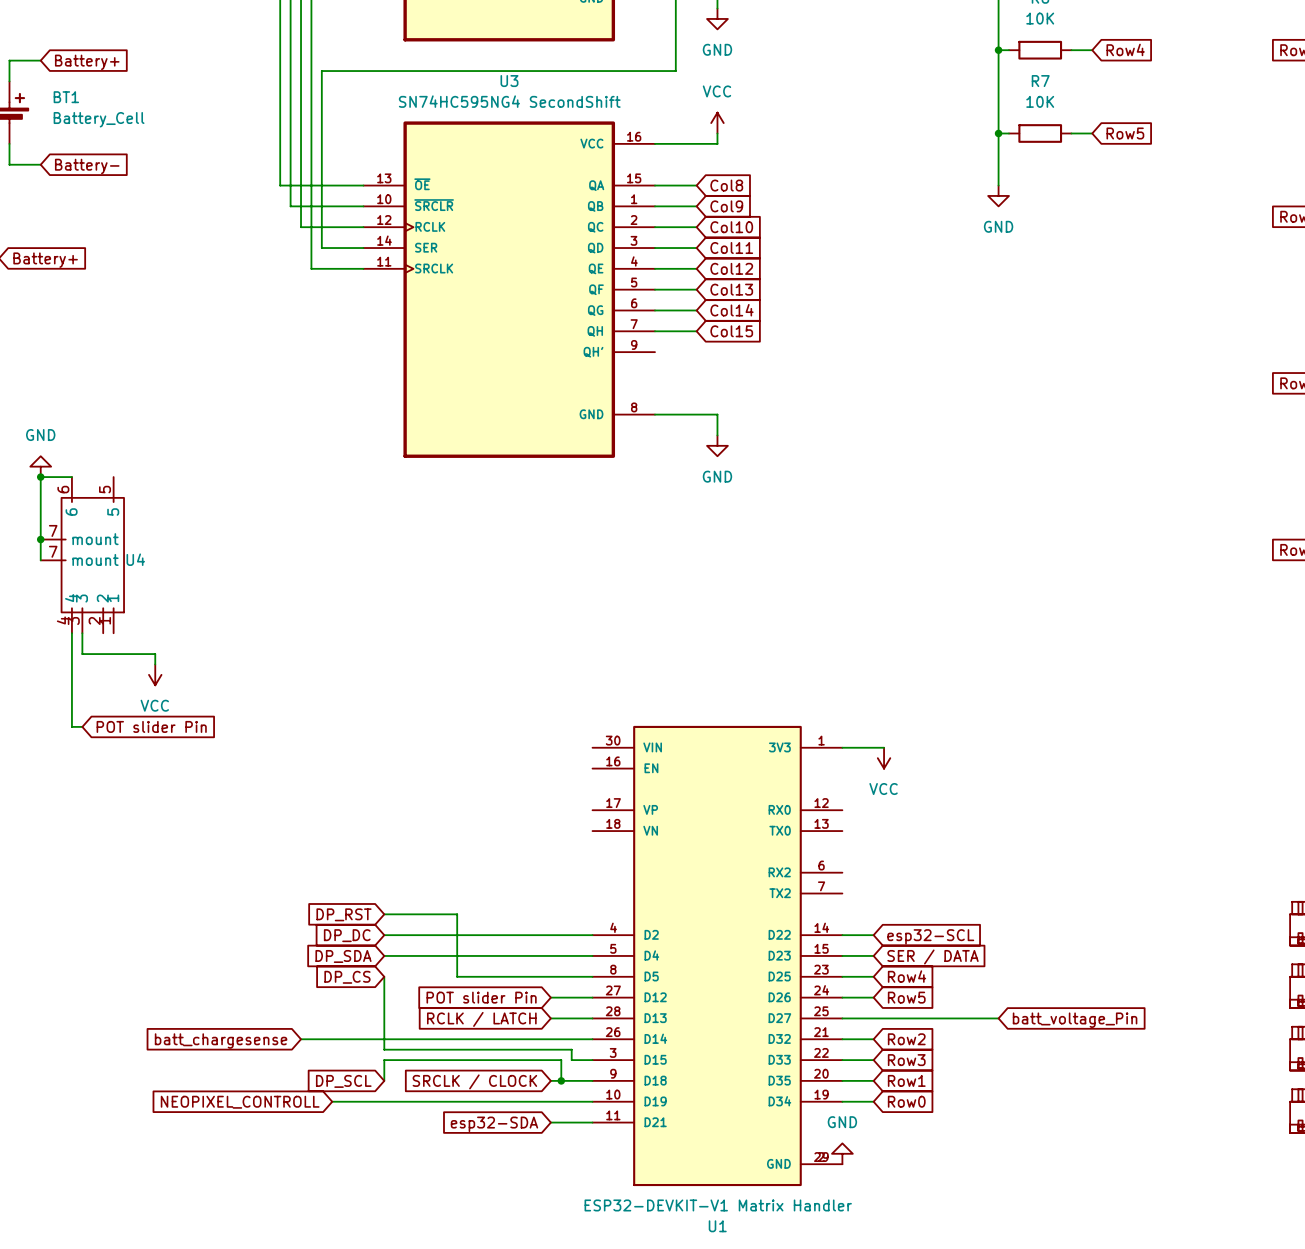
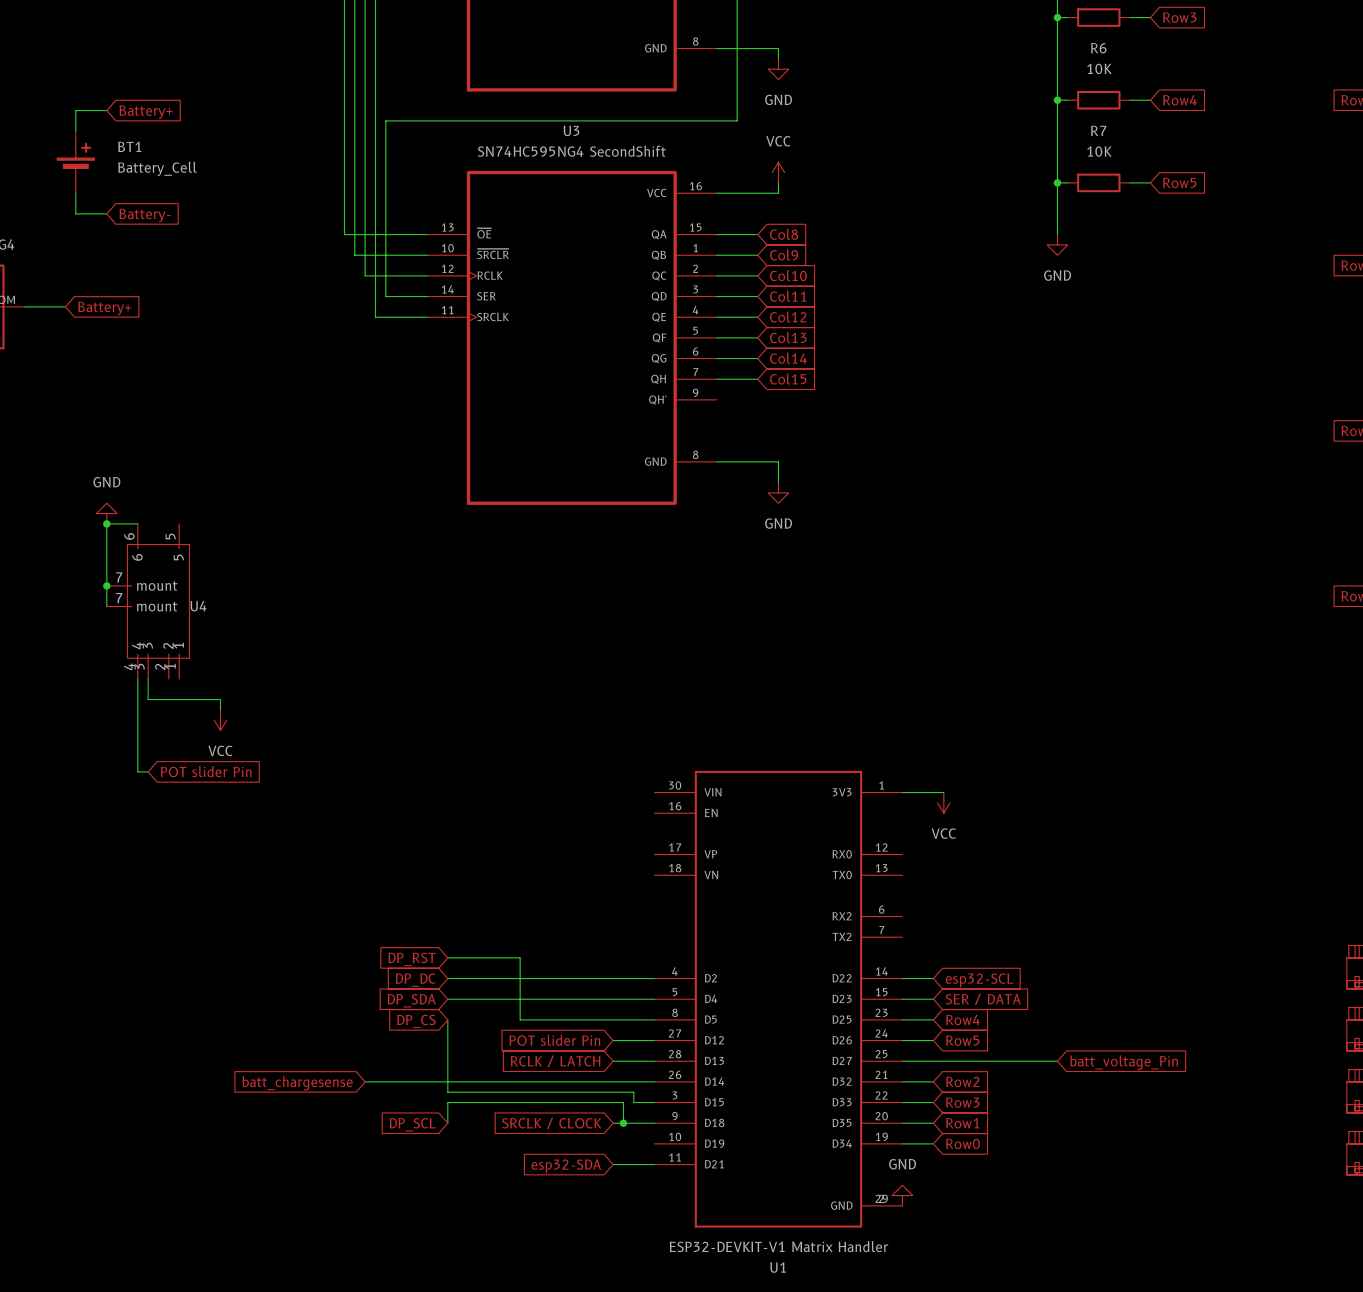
wire: (332, 1101) (592, 1101) -> none
global label: NEOPIXEL_CONTROLL (240, 1102) -> none

